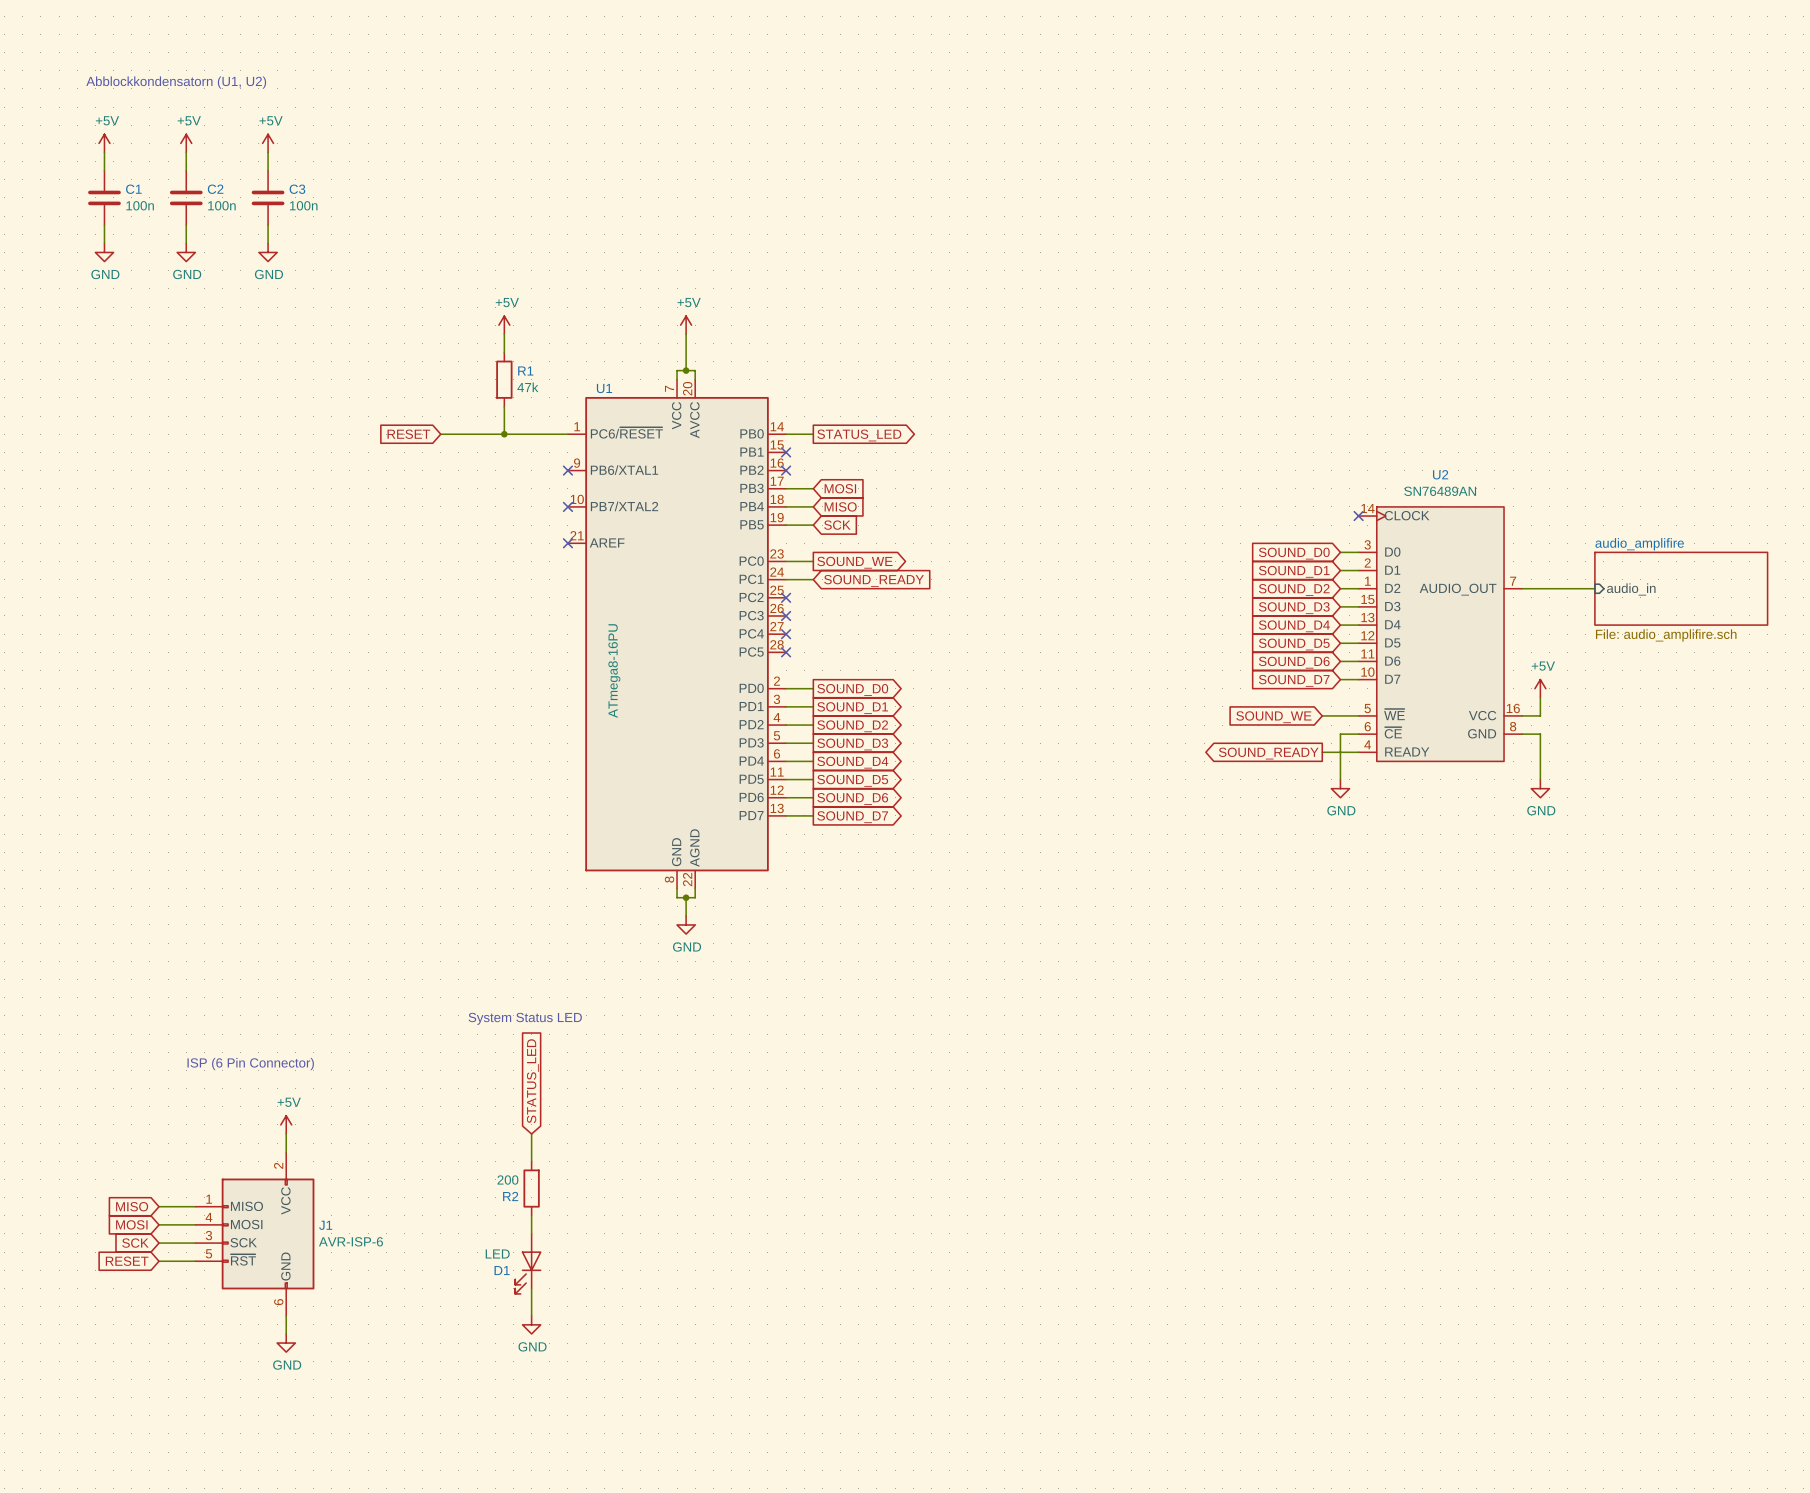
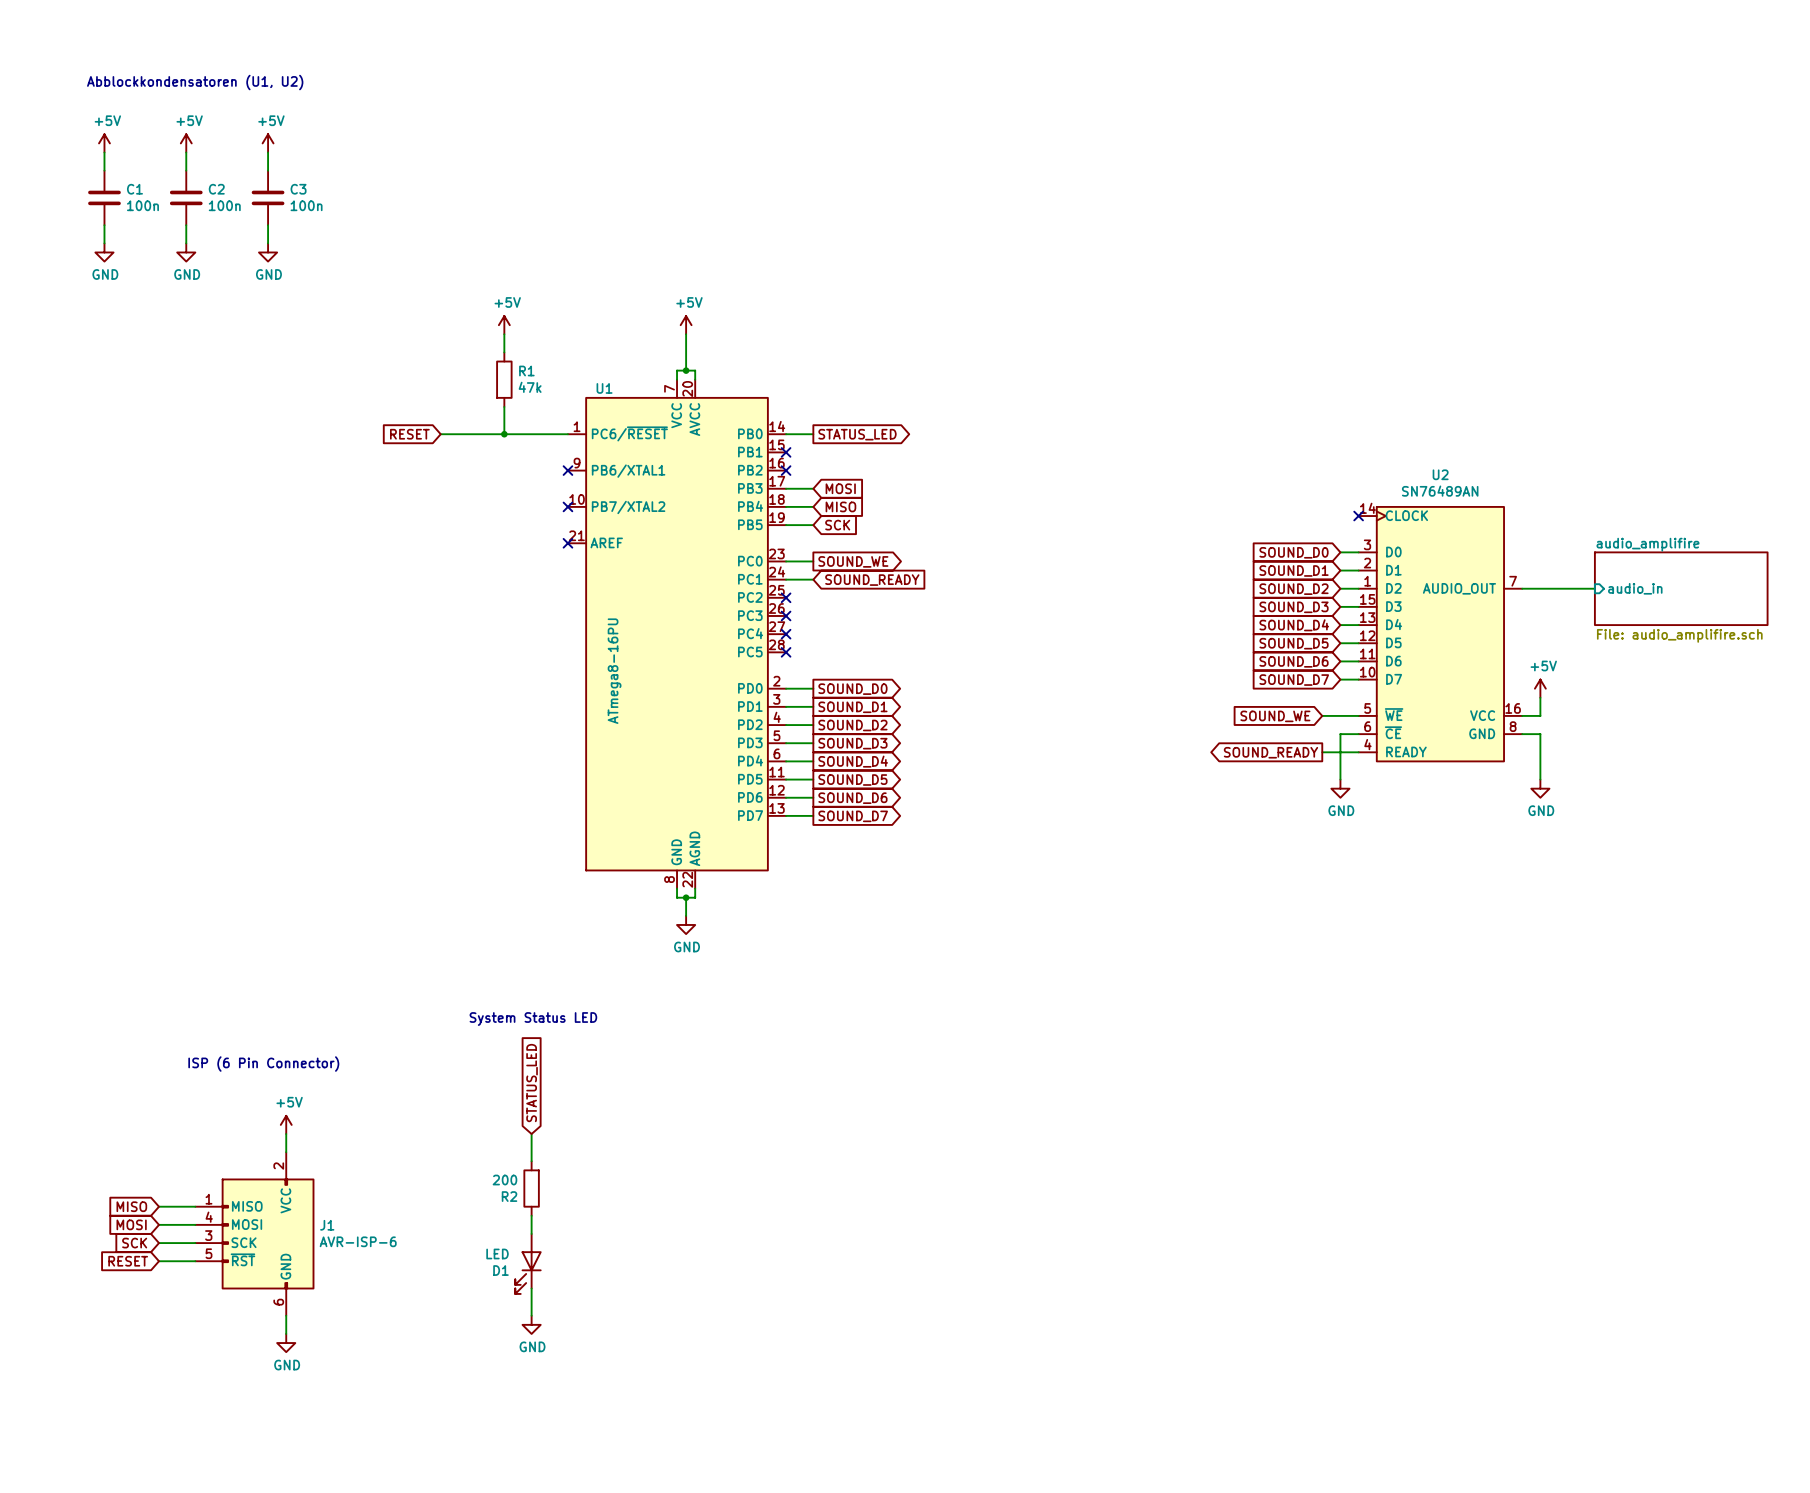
text: Abblockkondensatorn (U1, U2) (176, 82) -> Abblockkondensatoren (U1, U2) (195, 82)

